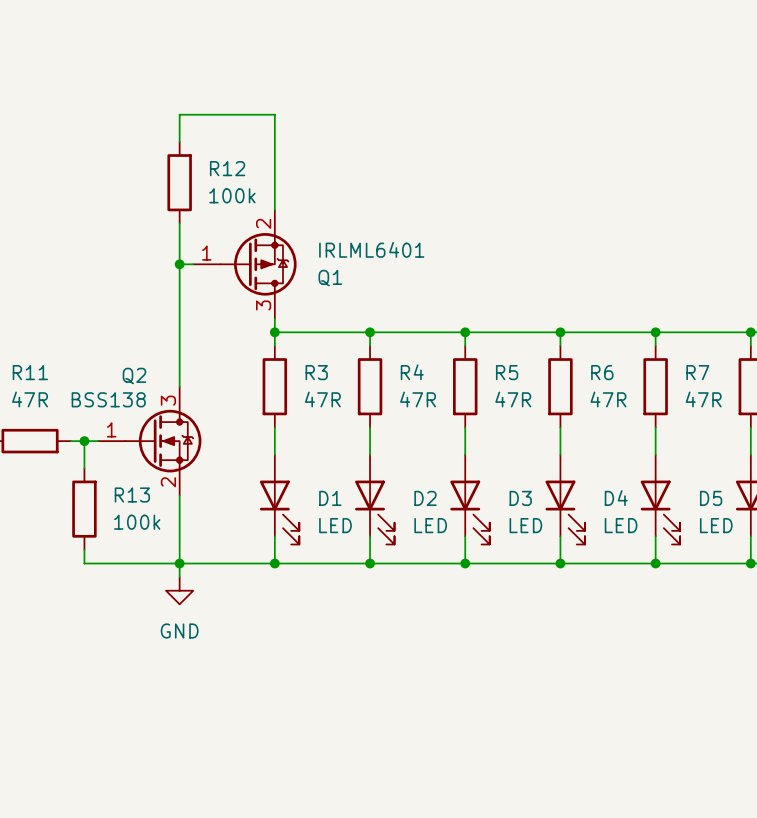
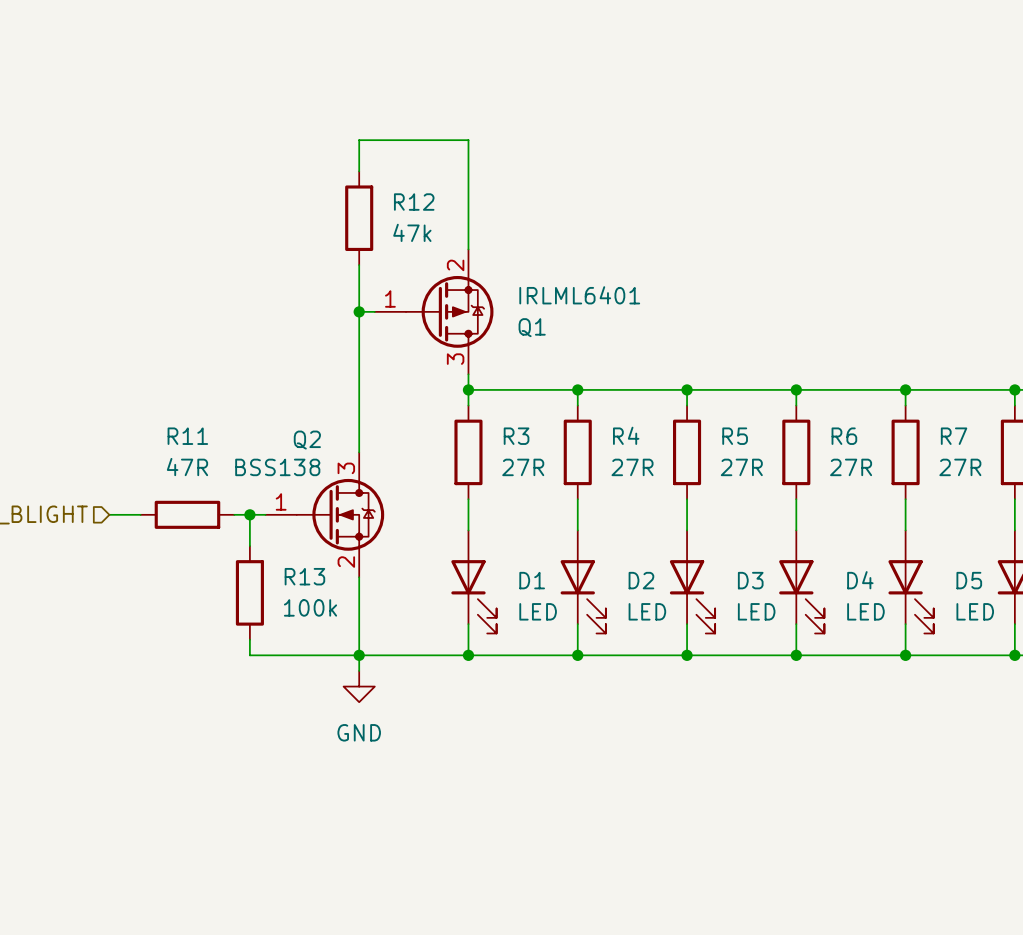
R12 value: 100k (232, 195) -> 47k (412, 232)
R3 value: 47R (322, 399) -> 27R (523, 467)
R4 value: 47R (418, 399) -> 27R (632, 467)
R5 value: 47R (513, 399) -> 27R (741, 467)
R6 value: 47R (608, 399) -> 27R (851, 467)
R7 value: 47R (703, 399) -> 27R (960, 467)

